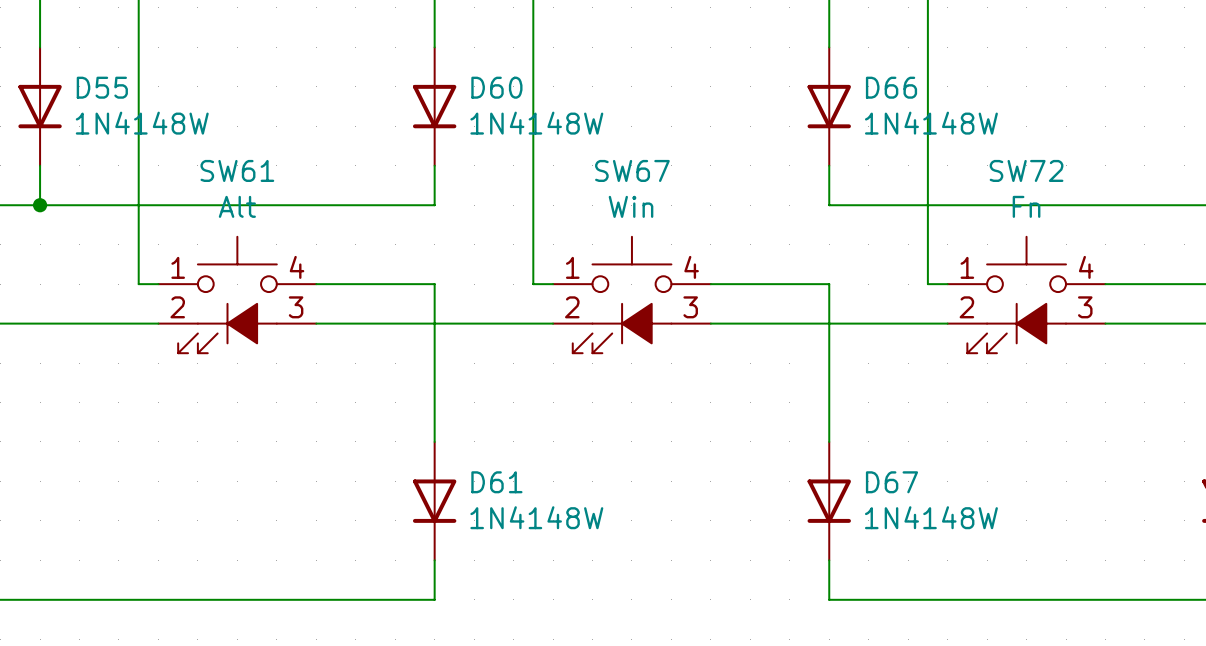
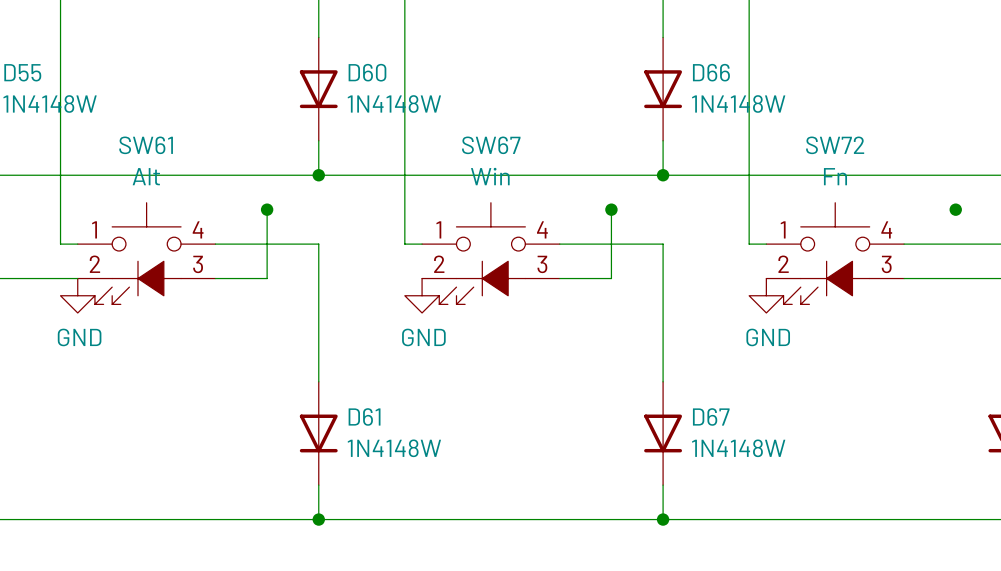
wire: none -> (318, 175) (663, 175)
junction: none -> (318, 175)
junction: none -> (663, 175)
junction: none -> (267, 209)
junction: none -> (611, 209)
junction: none -> (955, 209)
wire: (375, 323) (553, 323) -> (267, 278) (267, 209)
wire: (770, 323) (947, 323) -> (611, 278) (611, 209)
power symbol: none -> GND (77, 295)
power symbol: none -> GND (422, 295)
power symbol: none -> GND (766, 295)
wire: none -> (318, 519) (663, 519)
junction: none -> (318, 519)
junction: none -> (663, 519)

